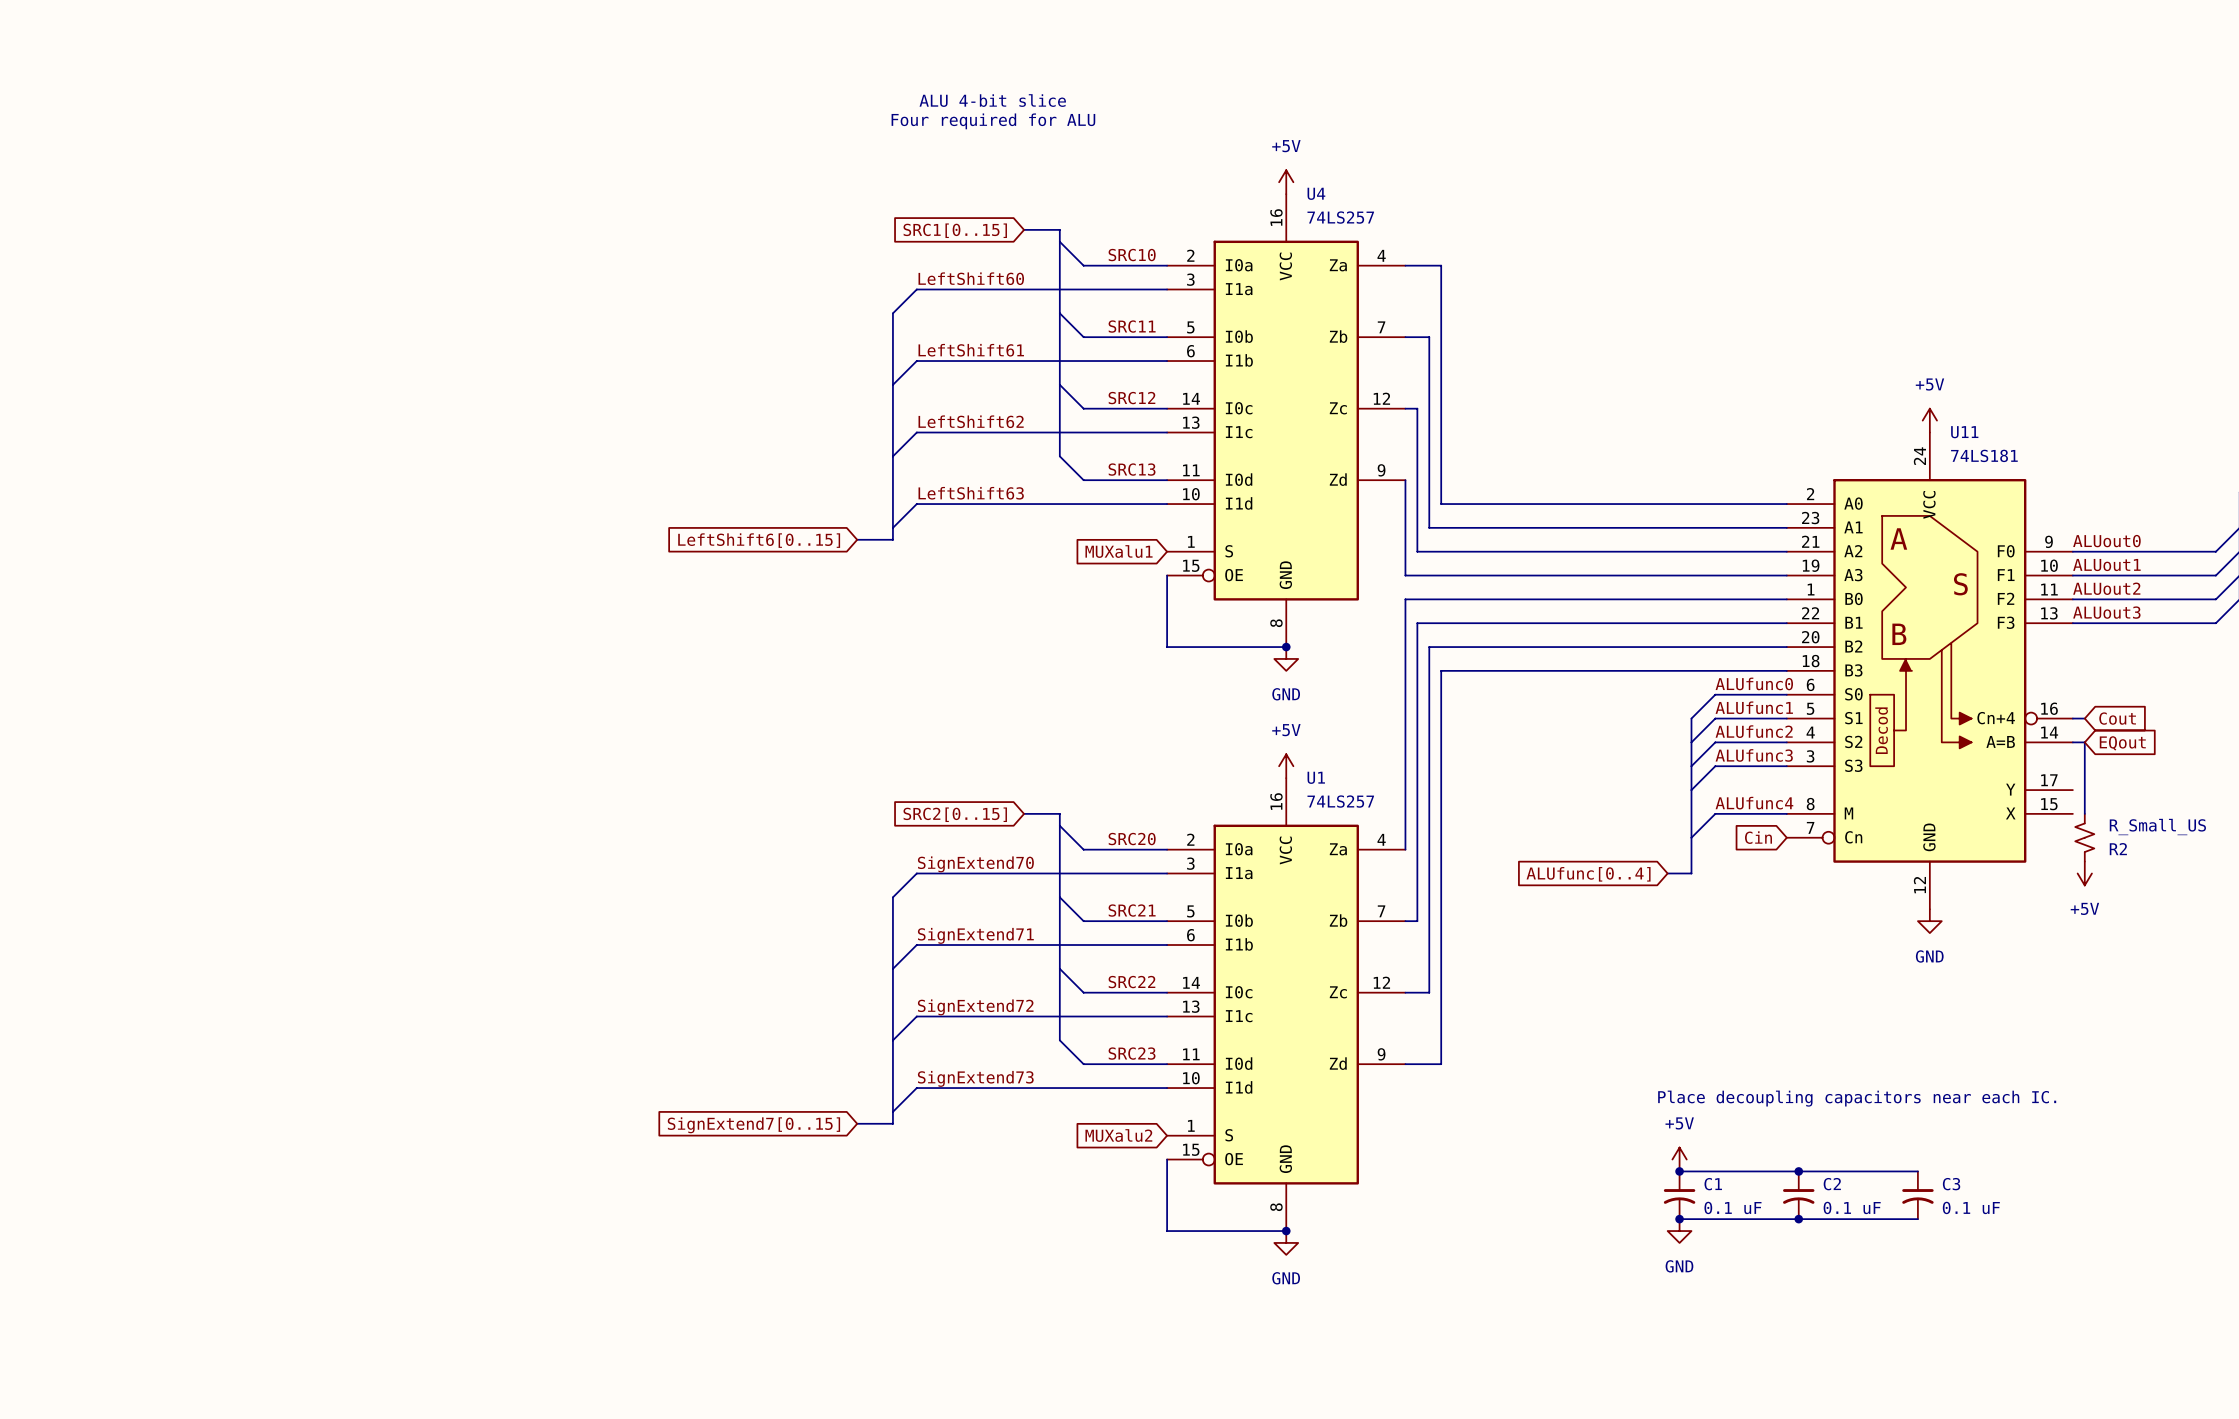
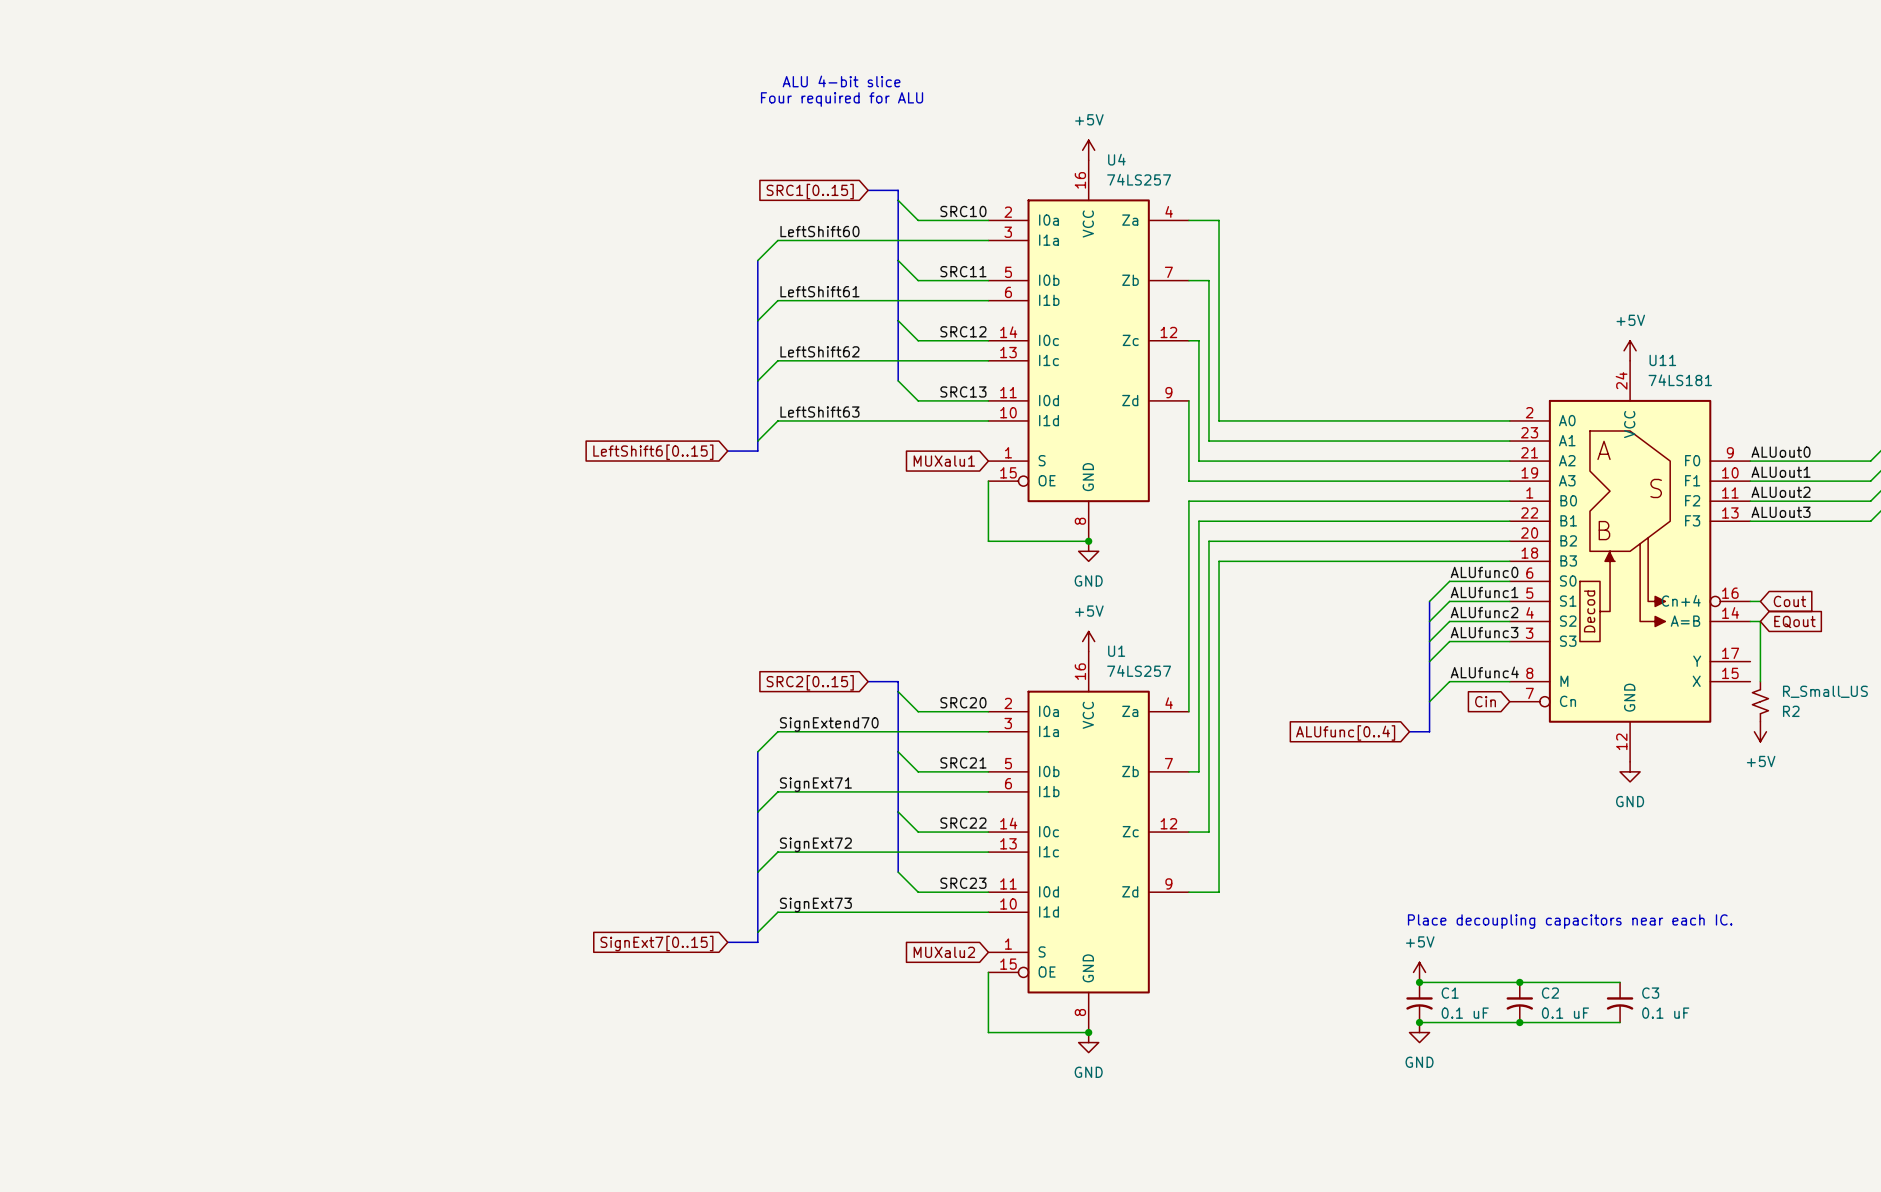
label: SignExtend71 (975, 935) -> SignExt71 (815, 784)
label: SignExtend72 (975, 1007) -> SignExt72 (815, 844)
label: SignExtend73 (975, 1078) -> SignExt73 (815, 904)
global label: SignExtend7[0..15] (753, 1125) -> SignExt7[0..15] (656, 943)

